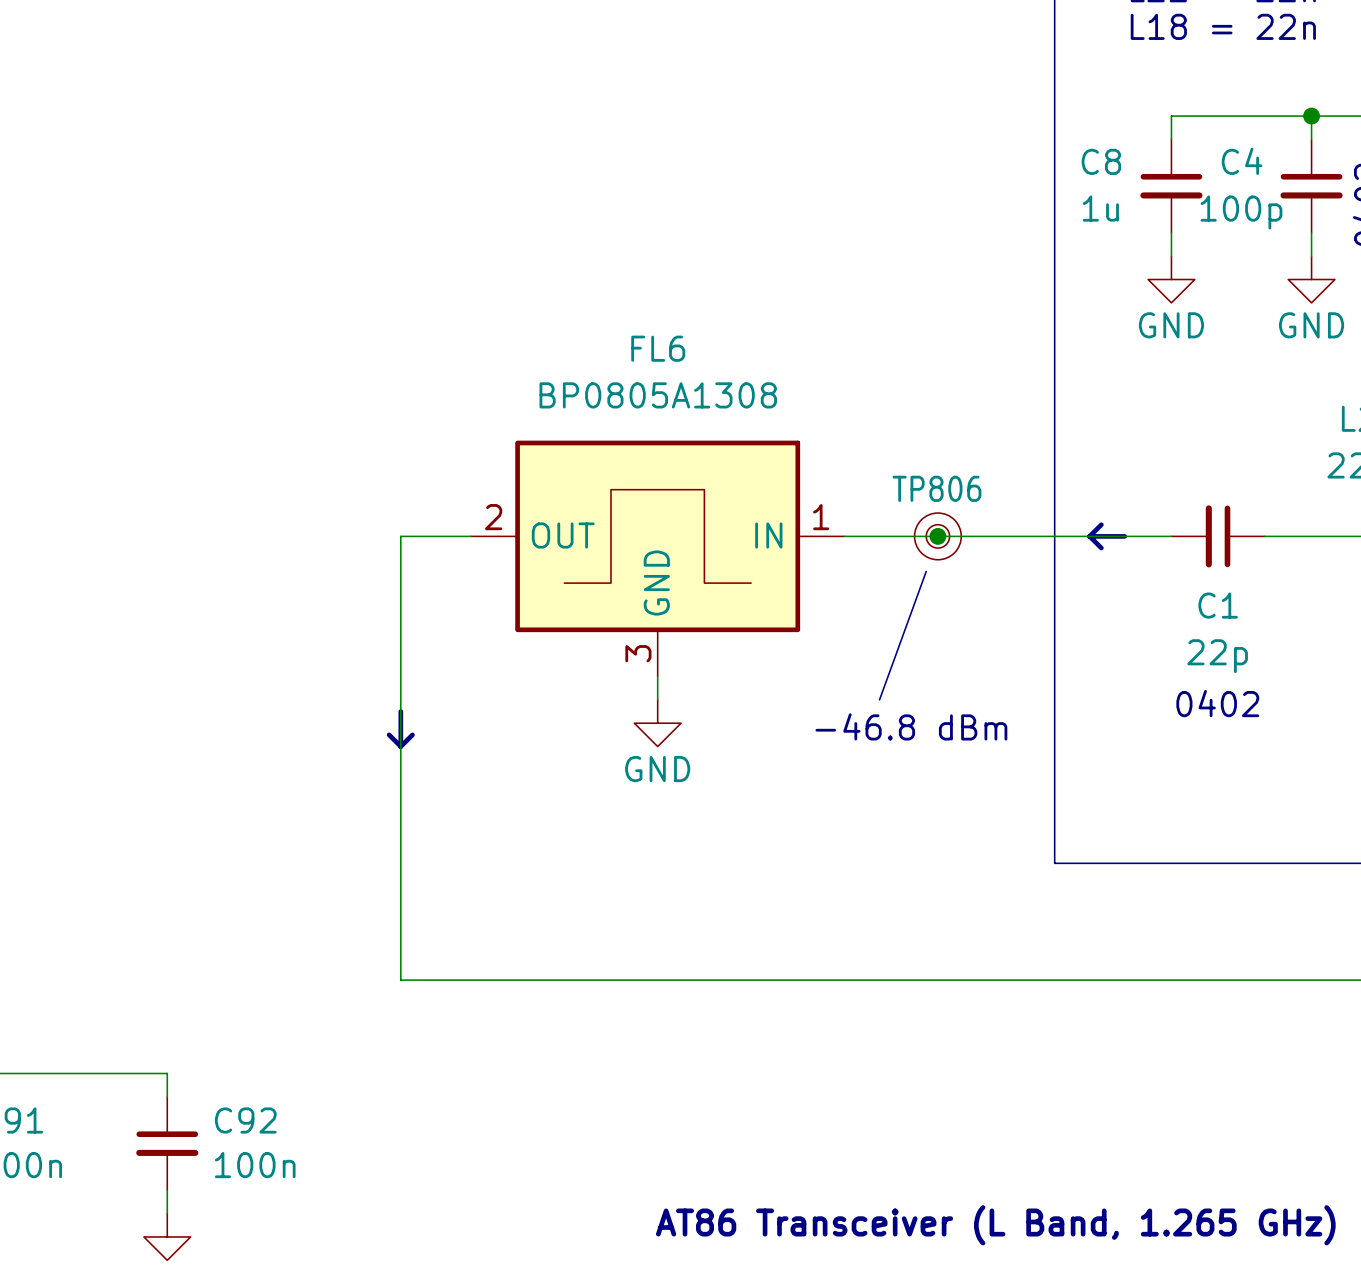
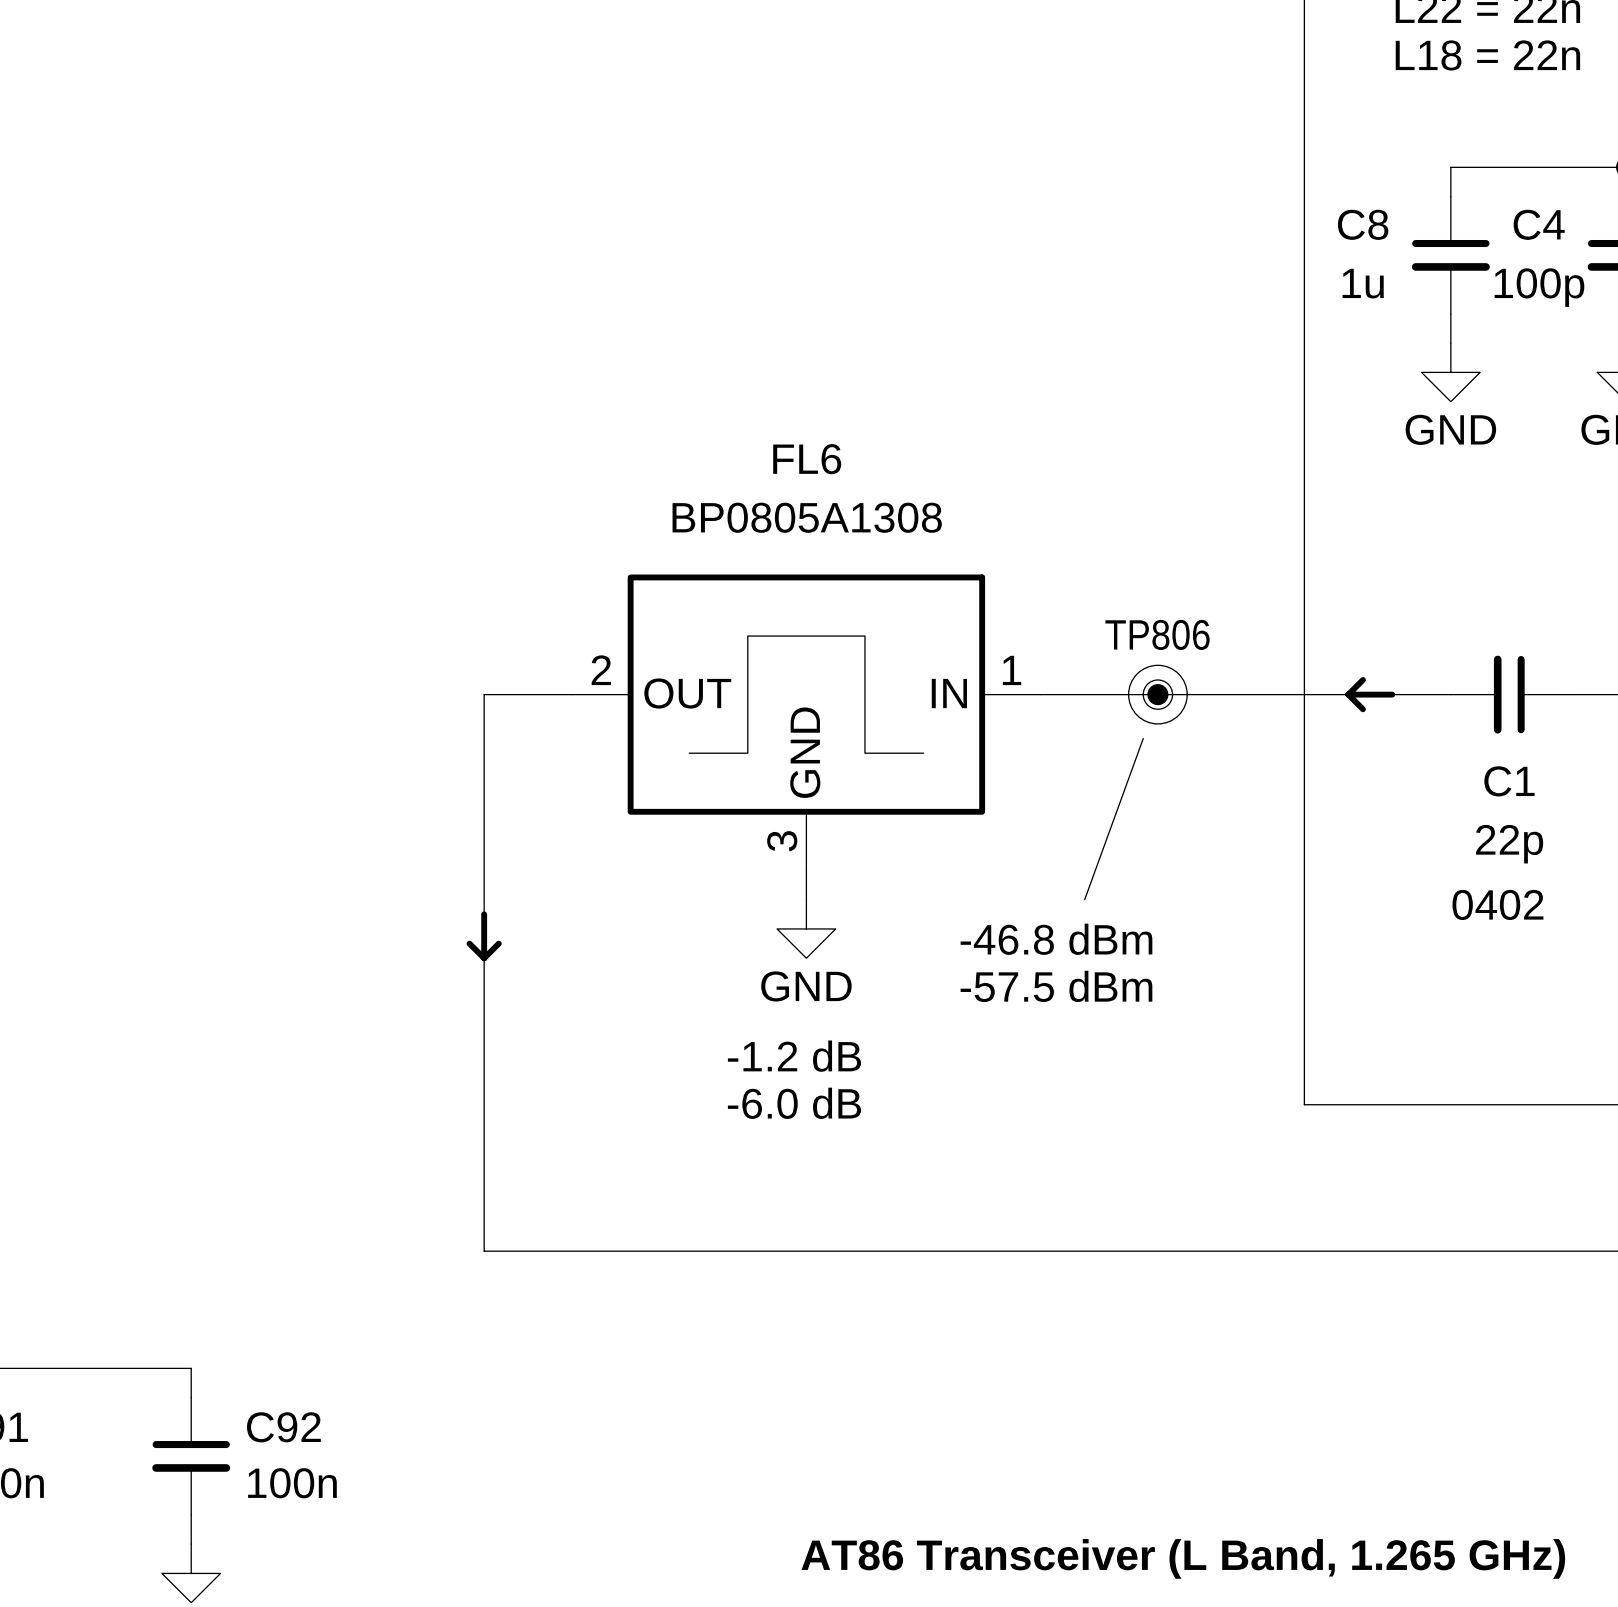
text position: -46.8 dBm (911, 726) -> -46.8 dBm (1056, 939)
text: none -> -57.5 dBm (1056, 986)
text: none -> -1.2 dB (794, 1056)
text: none -> -6.0 dB (794, 1103)

